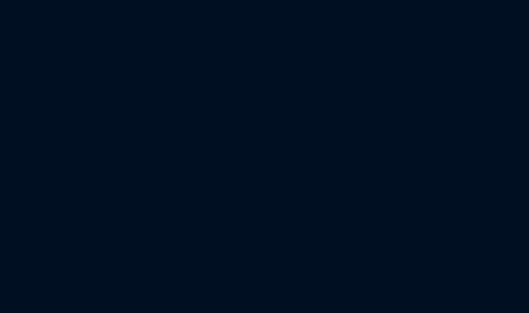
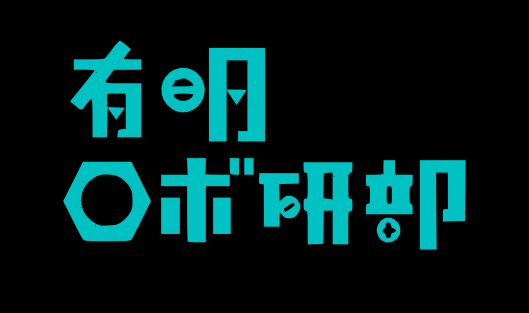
drawing: none -> [63, 40, 466, 250]

